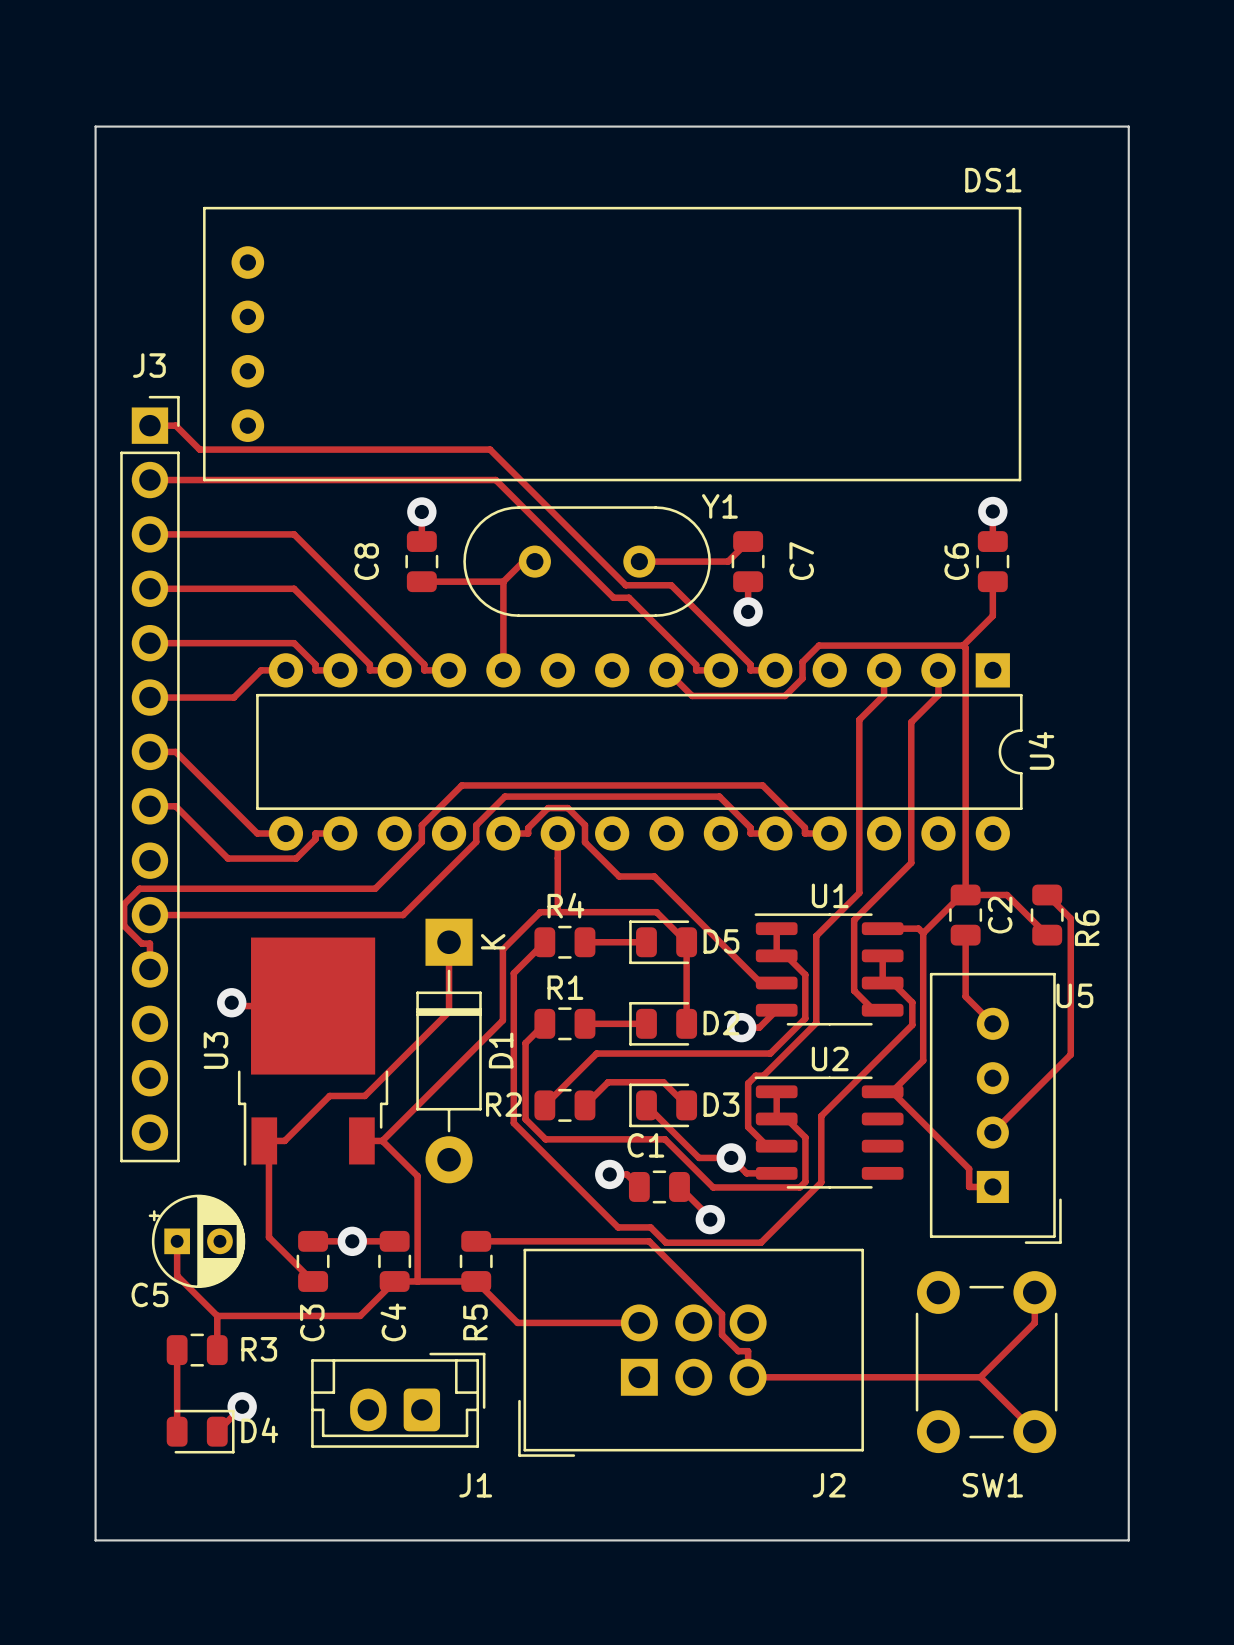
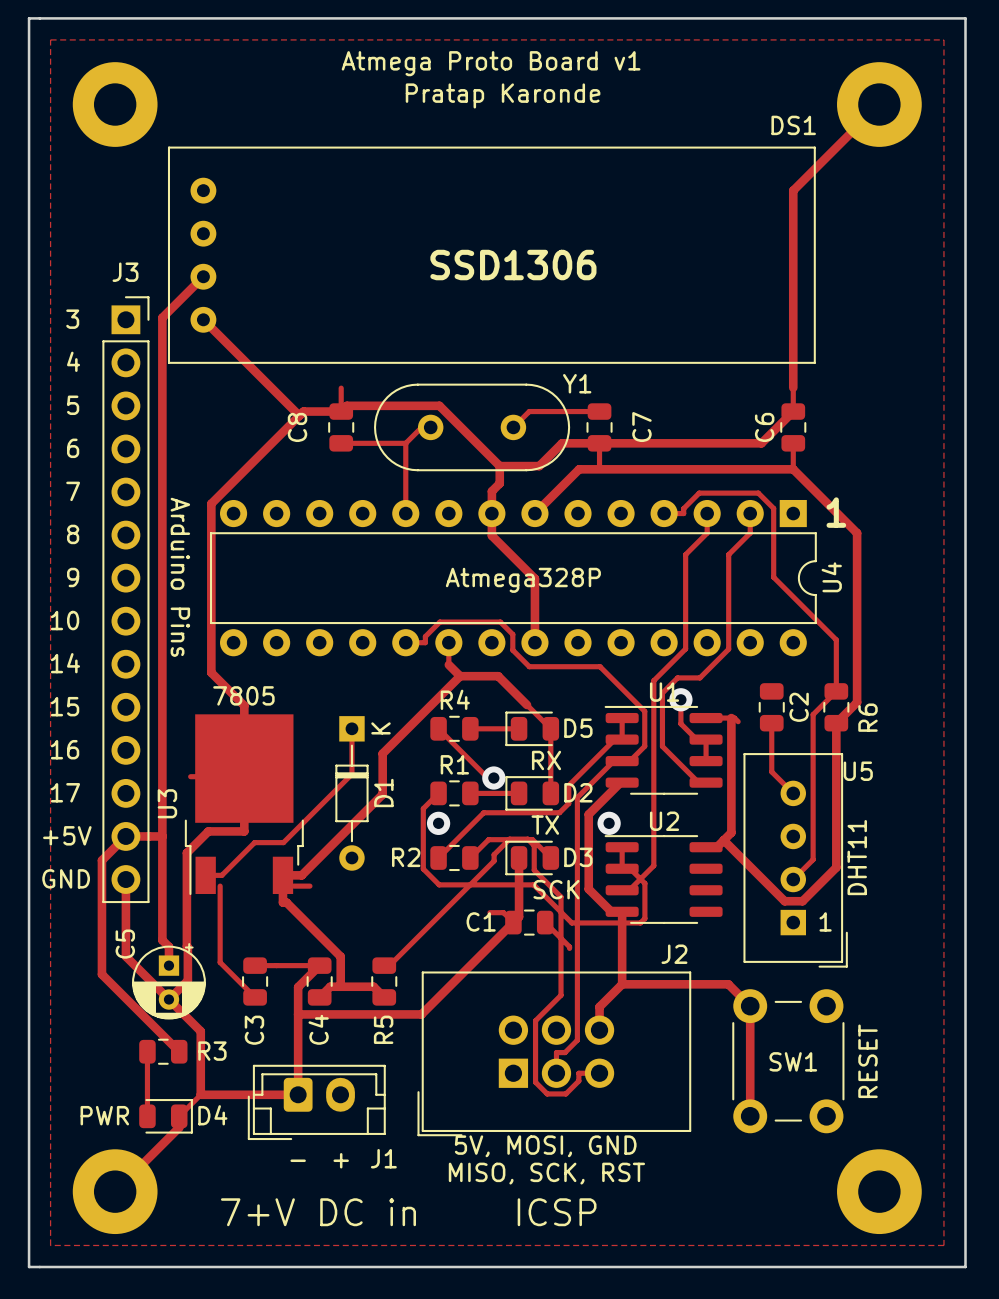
zone outline: none -> (50, 39) (943, 39) (943, 1245) (50, 1245) (50, 39)
text: none -> Atmega Proto Board v1 (491, 63)
board edge: (95, 126) (95, 1540) (1128, 1540) (1128, 126) (95, 126) -> (29, 18) (29, 1267) (965, 1267) (965, 18) (29, 18)
text: none -> Pratap Karonde (503, 95)
part: none -> (115, 104)
track: none -> (879, 104) (793, 190) (793, 387)
part: none -> (879, 104)
text: none -> SSD1306 (513, 265)
track: none -> (203, 276) (162, 317) (162, 940) (168, 946) (168, 965)
text: none -> 3 (72, 319)
track: (149, 425) (175, 425) (199, 449) (490, 449) (625, 585) (671, 585) (750, 664) (750, 670) (775, 670) -> none
track: none -> (203, 319) (299, 415)
text: none -> 4 (73, 361)
track: (149, 480) (495, 480) (613, 597) (628, 597) (696, 664) (696, 670) (720, 670) -> none
via: (421, 511) -> none
via: (992, 511) -> none
text: none -> 5 (73, 405)
track: (149, 534) (294, 534) (424, 664) (424, 670) (449, 670) -> none
track: (748, 541) (728, 561) (639, 561) -> (599, 411) (529, 411) (513, 427)
track: none -> (793, 411) (761, 443) (562, 443) (539, 466) (499, 466)
text: none -> 6 (73, 448)
track: (149, 588) (294, 588) (369, 664) (369, 670) (394, 670) -> none
track: none -> (499, 466) (439, 405) (346, 405) (341, 411) (303, 411) (211, 503) (211, 672) (244, 705) (244, 831) (208, 831) (186, 852) (187, 980) (168, 999)
track: none -> (499, 466) (499, 483) (491, 491) (491, 535) (534, 578) (534, 642)
via: (748, 611) -> none
track: (992, 614) (963, 645) -> none
text: none -> 7 (73, 491)
track: (149, 643) (294, 643) (315, 664) (315, 670) (340, 670) -> none
track: (963, 645) (818, 645) (802, 662) (802, 678) (785, 695) (692, 695) (666, 670) -> (723, 840) (784, 901) (802, 901) (836, 867) (836, 723) (857, 702) (857, 533) (793, 469) (579, 469) (534, 513)
track: (963, 645) (965, 648) (965, 894) -> none
text: none -> 1 (836, 512)
track: (285, 670) (261, 670) (233, 697) (149, 697) -> none
text: none -> 8 (73, 534)
track: (859, 719) (859, 892) (816, 936) (816, 1023) (763, 1075) (755, 1075) (748, 1083) (748, 1127) (767, 1146) (776, 1146) -> (687, 552) (685, 554) (685, 648) (653, 680) (653, 865) (629, 890) (622, 890)
text: none -> Arduino Pins (180, 577)
text: none -> 9 (73, 577)
track: (149, 751) (175, 751) (257, 833) (285, 833) -> none
text: none -> Atmega328P (523, 580)
text: none -> 10 (65, 620)
track: (149, 806) (175, 806) (228, 858) (296, 858) (315, 839) (315, 833) (340, 833) -> none
track: (528, 828) (548, 808) (567, 808) (584, 825) (584, 842) (619, 876) (654, 876) (760, 983) (766, 983) -> (425, 638) (439, 622) (500, 622) (512, 634) (512, 650) (529, 666) (600, 666) (644, 711) (644, 746) (629, 761) (622, 761)
track: (775, 833) (750, 833) (750, 827) (719, 796) (504, 796) (476, 825) (476, 841) (403, 915) (149, 915) -> none
track: (829, 833) (804, 833) (804, 827) (762, 785) (461, 785) (421, 825) (421, 842) (375, 888) (139, 888) (124, 904) (124, 925) (141, 943) (149, 943) (149, 969) -> none
track: (911, 841) (911, 862) (854, 920) (854, 990) (873, 1010) -> (728, 649) (699, 677) (677, 677) (662, 693) (662, 746) (698, 782)
text: none -> 14 (65, 663)
track: (557, 861) (557, 912) -> (448, 664) (460, 676)
track: none -> (460, 676) (382, 753) (382, 794) (301, 875) (282, 875) (282, 902) (286, 902) (340, 956) (340, 986)
track: (1047, 894) (1070, 918) (1070, 1054) (1017, 1107) -> (664, 513) (683, 513) (683, 508) (699, 493) (758, 493) (773, 508) (773, 577) (836, 639) (836, 691) (813, 714) (813, 859)
text: none -> 7805 (243, 695)
track: none -> (680, 699) (680, 723) (696, 739) (706, 739)
via: none -> (680, 699)
track: (656, 912) (540, 912) (502, 949) (502, 1020) (382, 1140) (417, 1176) (417, 1281) -> (527, 705) (498, 676) (460, 676)
text: none -> 15 (65, 706)
D1 footprint: [416, 918, 482, 1184] -> [335, 716, 369, 871]
track: none -> (731, 718) (731, 832) (716, 847) (713, 847)
track: (1047, 935) (1007, 894) (961, 894) (923, 933) (923, 1060) (892, 1091) (969, 1168) (969, 1186) (992, 1186) -> none
track: none -> (351, 728) (351, 774) (283, 842) (254, 842) (221, 875) (205, 875)
track: (449, 942) (449, 1011) (364, 1095) (329, 1095) (284, 1140) (264, 1140) -> none
track: (544, 942) (513, 973) (513, 1123) (618, 1227) (650, 1227) (665, 1242) (761, 1242) (821, 1182) (821, 1116) (912, 1025) (912, 1002) (892, 983) (882, 983) -> (438, 728) (487, 778) (493, 778)
track: (776, 955) (786, 955) (805, 974) (805, 1018) (770, 1053) (596, 1053) -> (622, 739) (614, 739) (568, 785) (568, 803) (559, 812) (483, 812) (479, 816)
text: none -> 16 (65, 749)
text: none -> RX (546, 760)
track: none -> (613, 761) (577, 797) (577, 1040) (565, 1052) (556, 1052) (556, 1073)
via: (231, 1002) -> none
via: none -> (493, 778)
track: (776, 1010) (759, 1027) (741, 1027) -> (622, 782) (588, 814) (588, 889) (611, 911)
text: none -> 17 (65, 792)
via position: (741, 1027) -> (609, 823)
U3 position: (313, 1051) -> (244, 804)
via: none -> (438, 823)
text: none -> TX (545, 825)
text: none -> +5V (67, 835)
text: none -> DHT11 (857, 857)
track: (646, 1105) (699, 1157) (731, 1157) (746, 1173) (763, 1173) -> (519, 857) (519, 916) (421, 1014) (298, 1014)
text: none -> GND (66, 878)
track: none -> (125, 879) (125, 956) (200, 1031) (200, 1094) (298, 1094) (298, 987) (319, 965)
C1 name position: C1 (645, 1145) -> C1 (481, 921)
text: none -> SCK (556, 889)
via: (731, 1157) -> none
track: none -> (622, 911) (622, 984)
via: (609, 1174) -> none
text: none -> 1 (825, 921)
via: (710, 1219) -> none
track: (177, 1241) (177, 1275) (217, 1315) -> none
C5 rotation: 0° (196, 1241) -> 90° clockwise (168, 981)
via: (352, 1241) -> none
track: (482, 1241) (649, 1241) (722, 1314) (722, 1334) (738, 1351) (748, 1351) (748, 1377) (980, 1377) -> (389, 965) (494, 861) (494, 854) (509, 839) (527, 839) (534, 845) (534, 870) (561, 896) (561, 995) (535, 1020) (535, 1082) (547, 1093) (565, 1093) (578, 1081) (578, 1073) (599, 1073)
track: none -> (622, 984) (599, 1006) (599, 1030)
track: none -> (622, 984) (728, 984) (750, 1006) (750, 1116)
track: none -> (319, 997) (330, 986) (373, 986) (384, 997)
track: (1034, 1292) (1034, 1322) (980, 1377) -> none
track: (217, 1315) (217, 1350) -> (162, 836) (125, 836) (101, 860) (101, 974) (179, 1051)
track: (217, 1315) (360, 1315) (394, 1281) (476, 1281) (517, 1322) (639, 1322) -> none
text: none -> RESET (867, 1061)
track: (980, 1377) (1034, 1431) -> none
J1 rotation: 0° (398, 1400) -> 180° (316, 1102)
via: (242, 1406) -> none
text: none -> PWR (104, 1115)
track: none -> (179, 1116) (179, 1127) (115, 1191)
text: none -> 5V, MOSI, GND (545, 1146)
J2 name position: J2 (829, 1485) -> J2 (674, 954)
SW1 name position: SW1 (992, 1485) -> SW1 (793, 1061)
text: none -> - (298, 1160)
text: none -> + (341, 1160)
text: none -> MISO, SCK, RST (546, 1173)
part: none -> (115, 1191)
part: none -> (879, 1191)
text: none -> 7+V DC in (318, 1212)
text: none -> ICSP (557, 1212)

